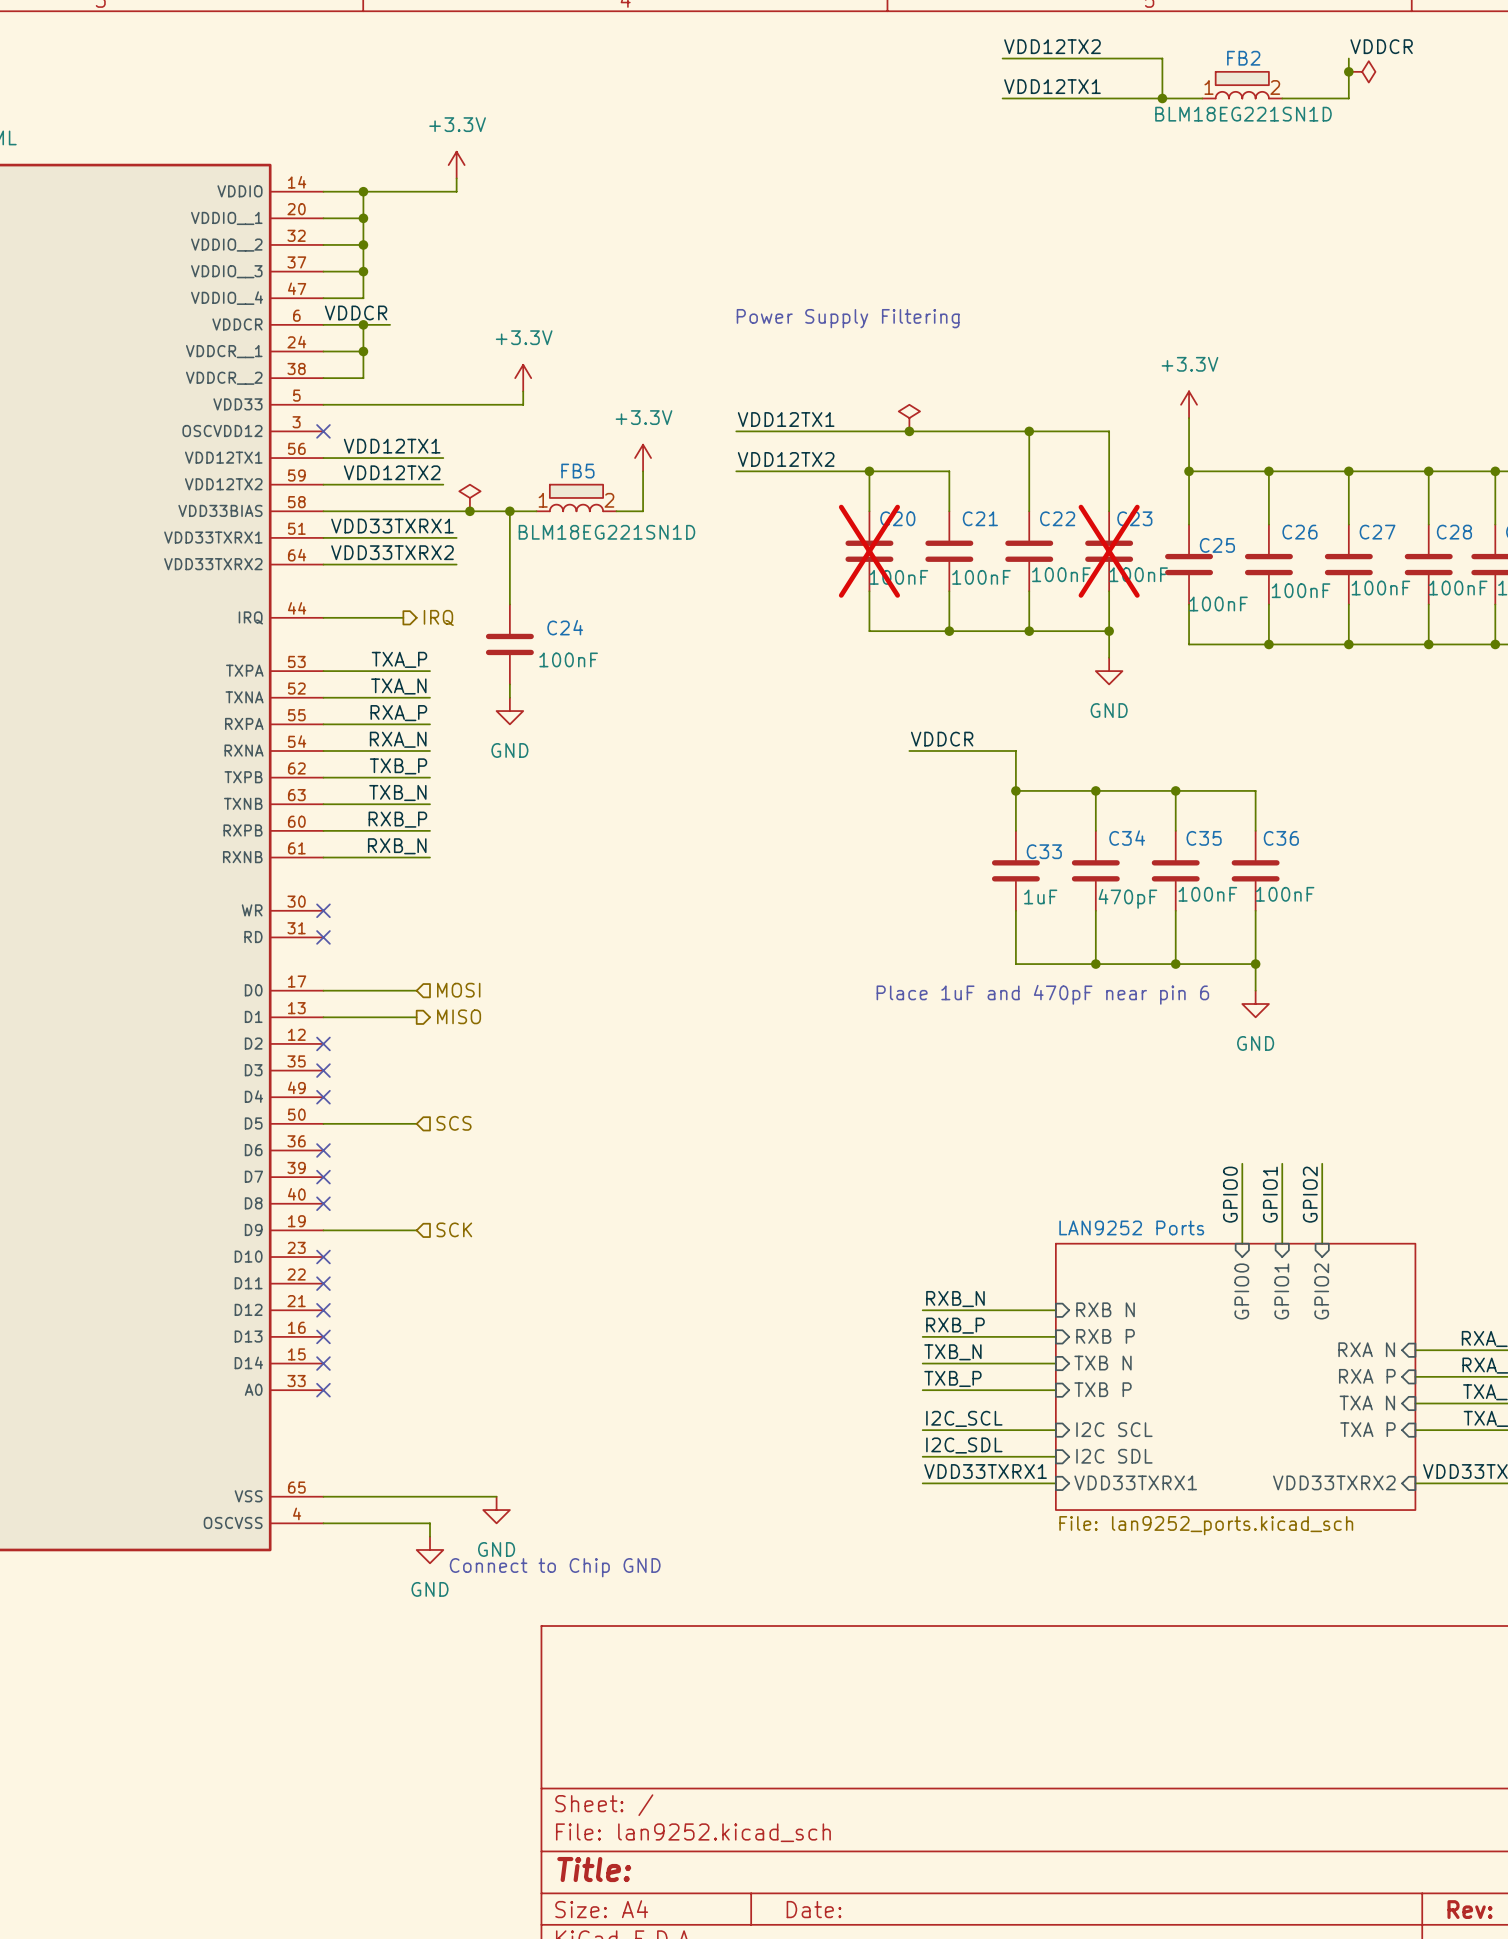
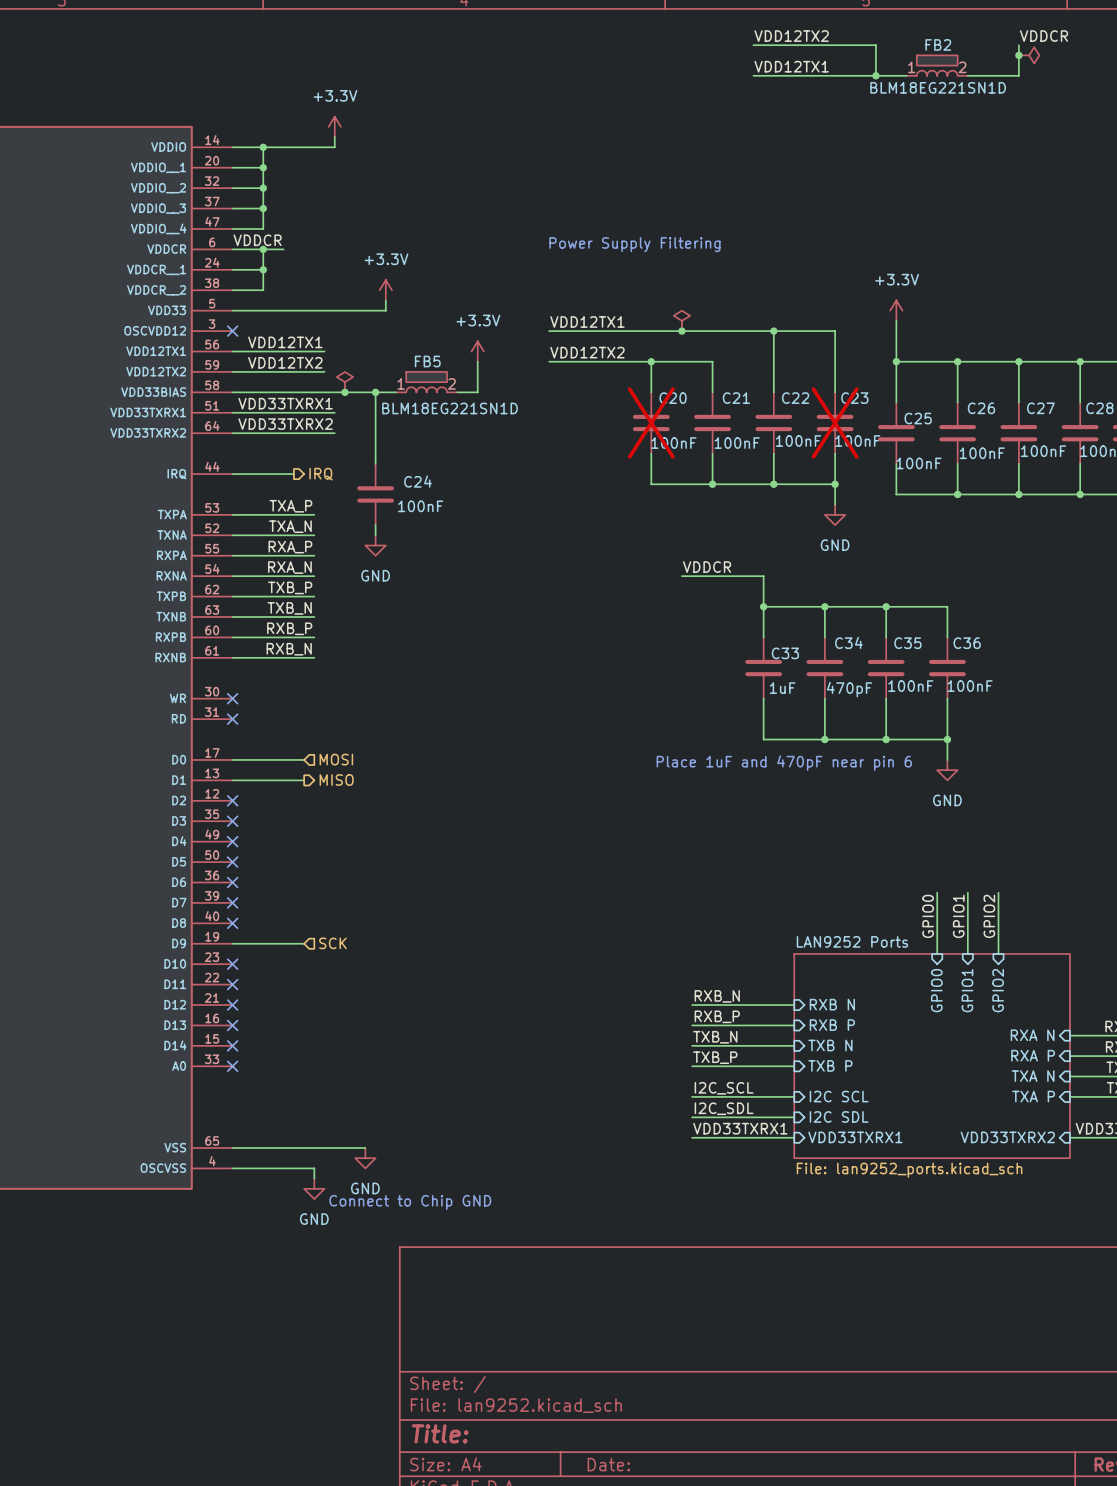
wire: (323, 1123) (416, 1123) -> none
no-connect mark: none -> (232, 862)
hierarchical label: SCS (453, 1123) -> none

